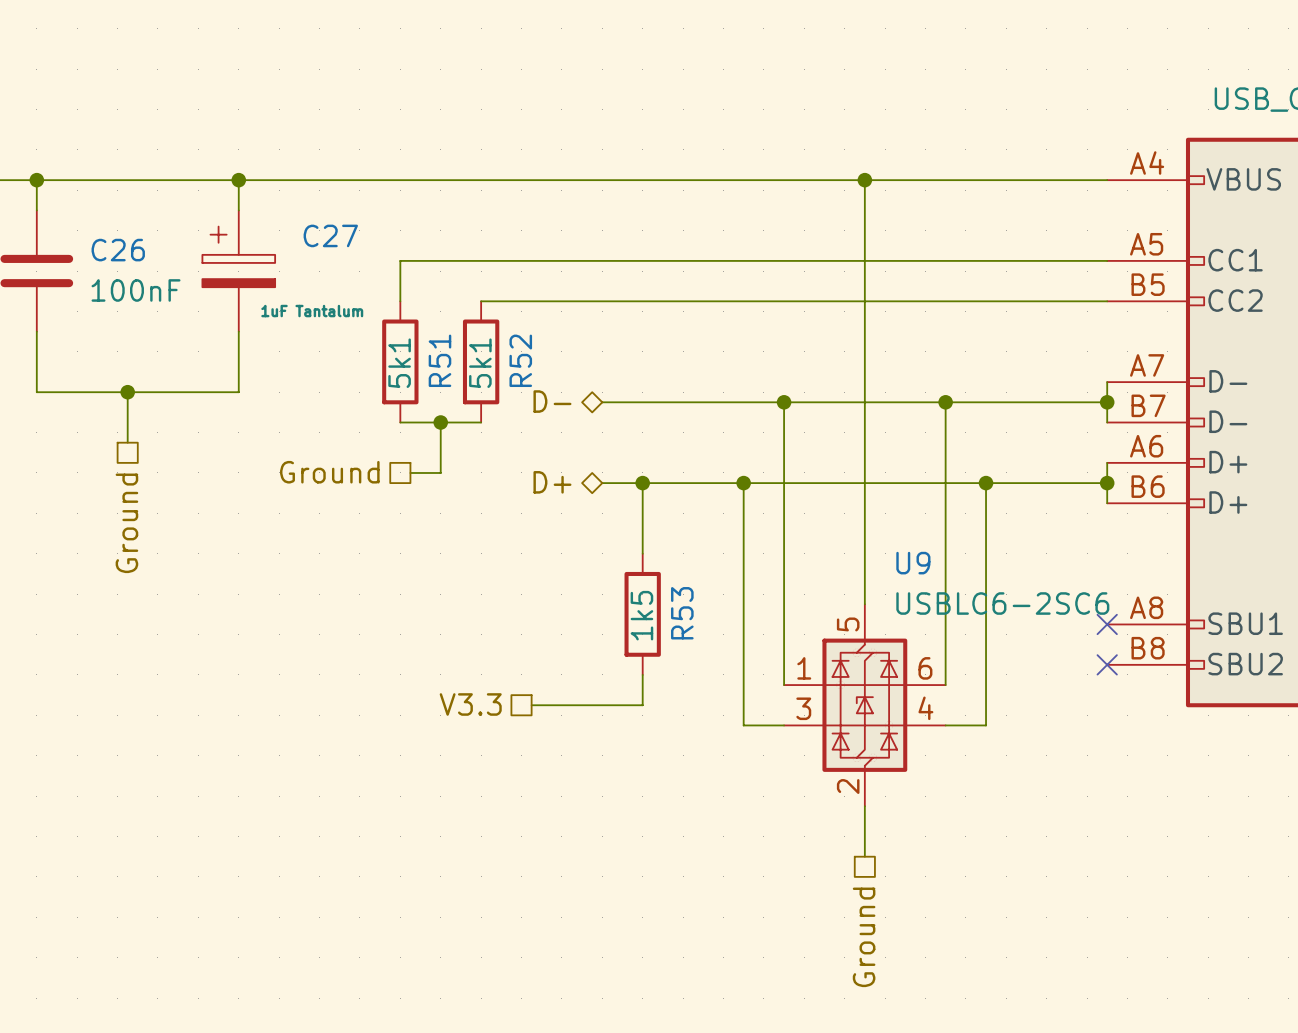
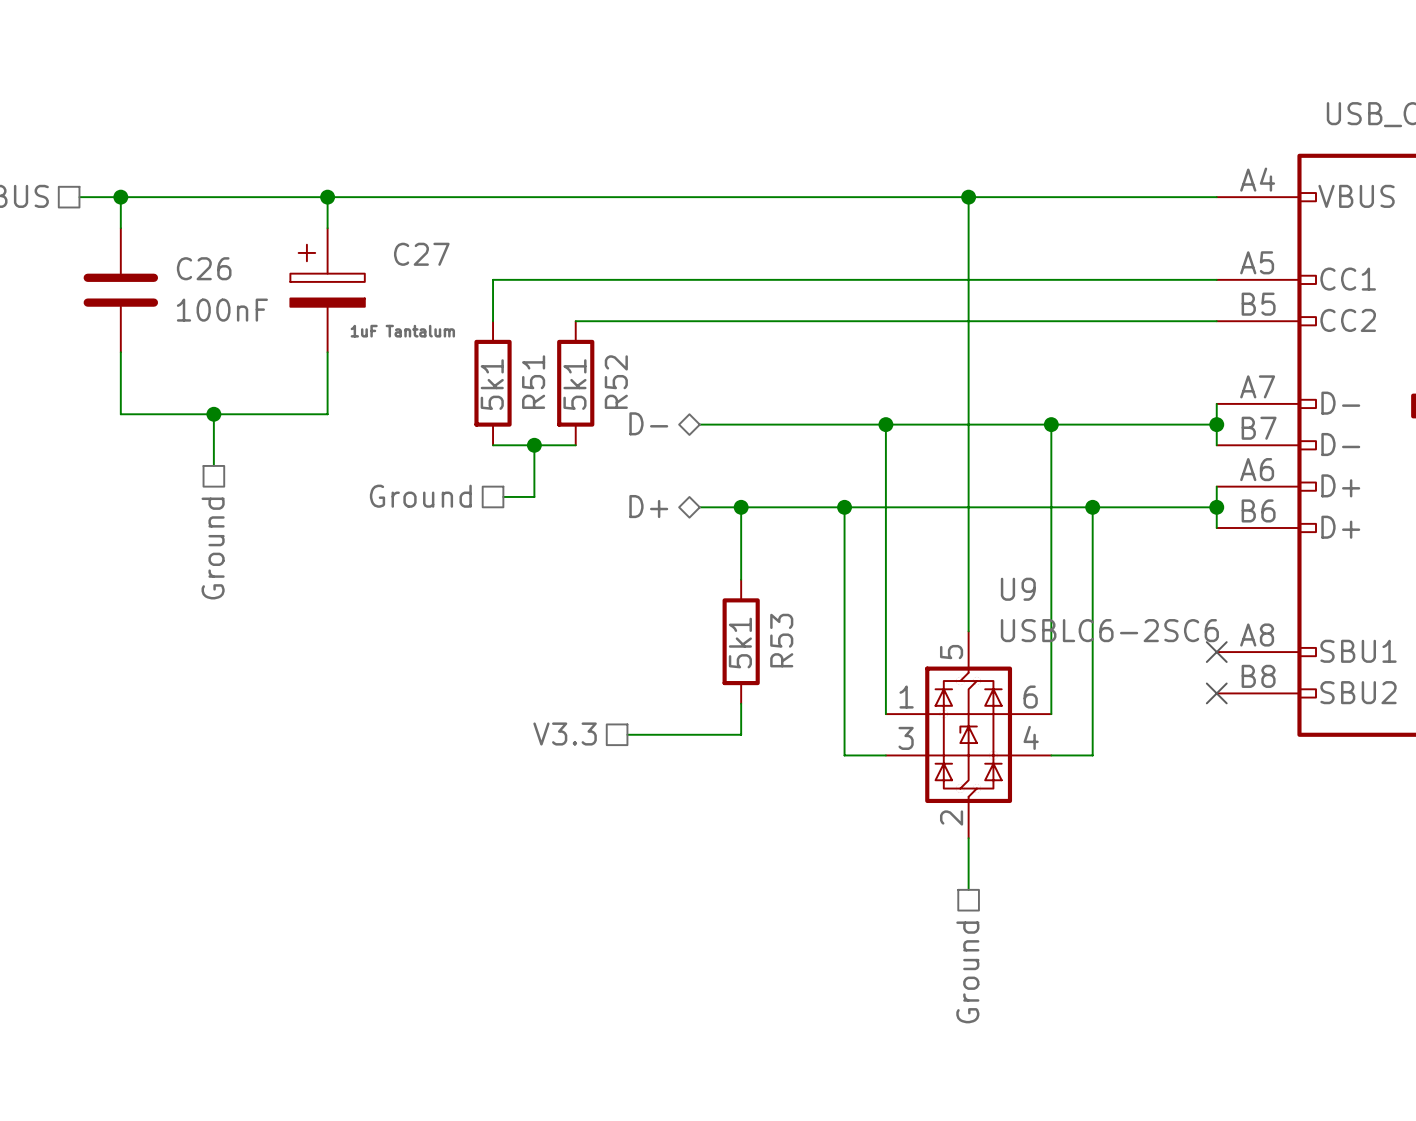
R53 value: 1k5 (641, 615) -> 5k1 (740, 643)

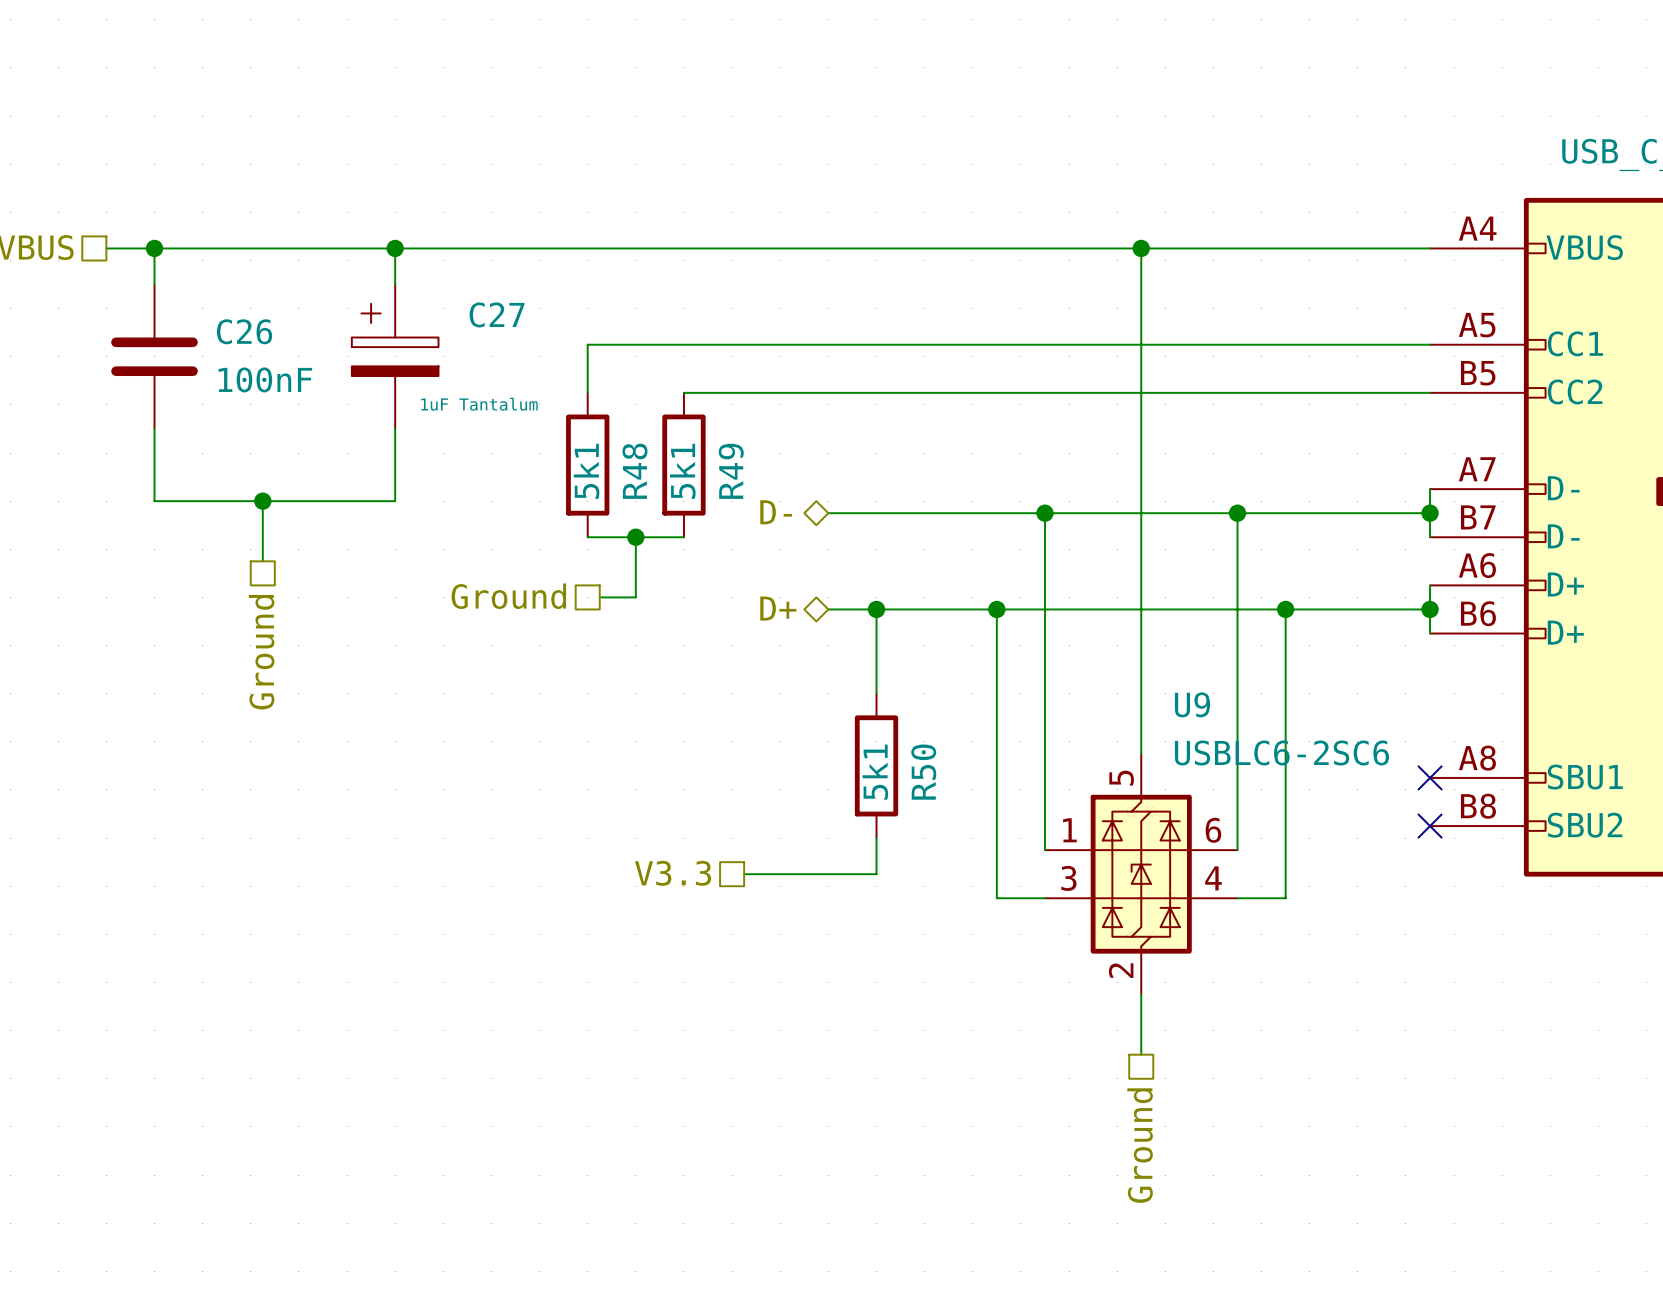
R51 name: R51 (533, 382) -> R48 (634, 471)
R52 name: R52 (616, 382) -> R49 (731, 471)
R53 name: R53 (781, 640) -> R50 (923, 772)

